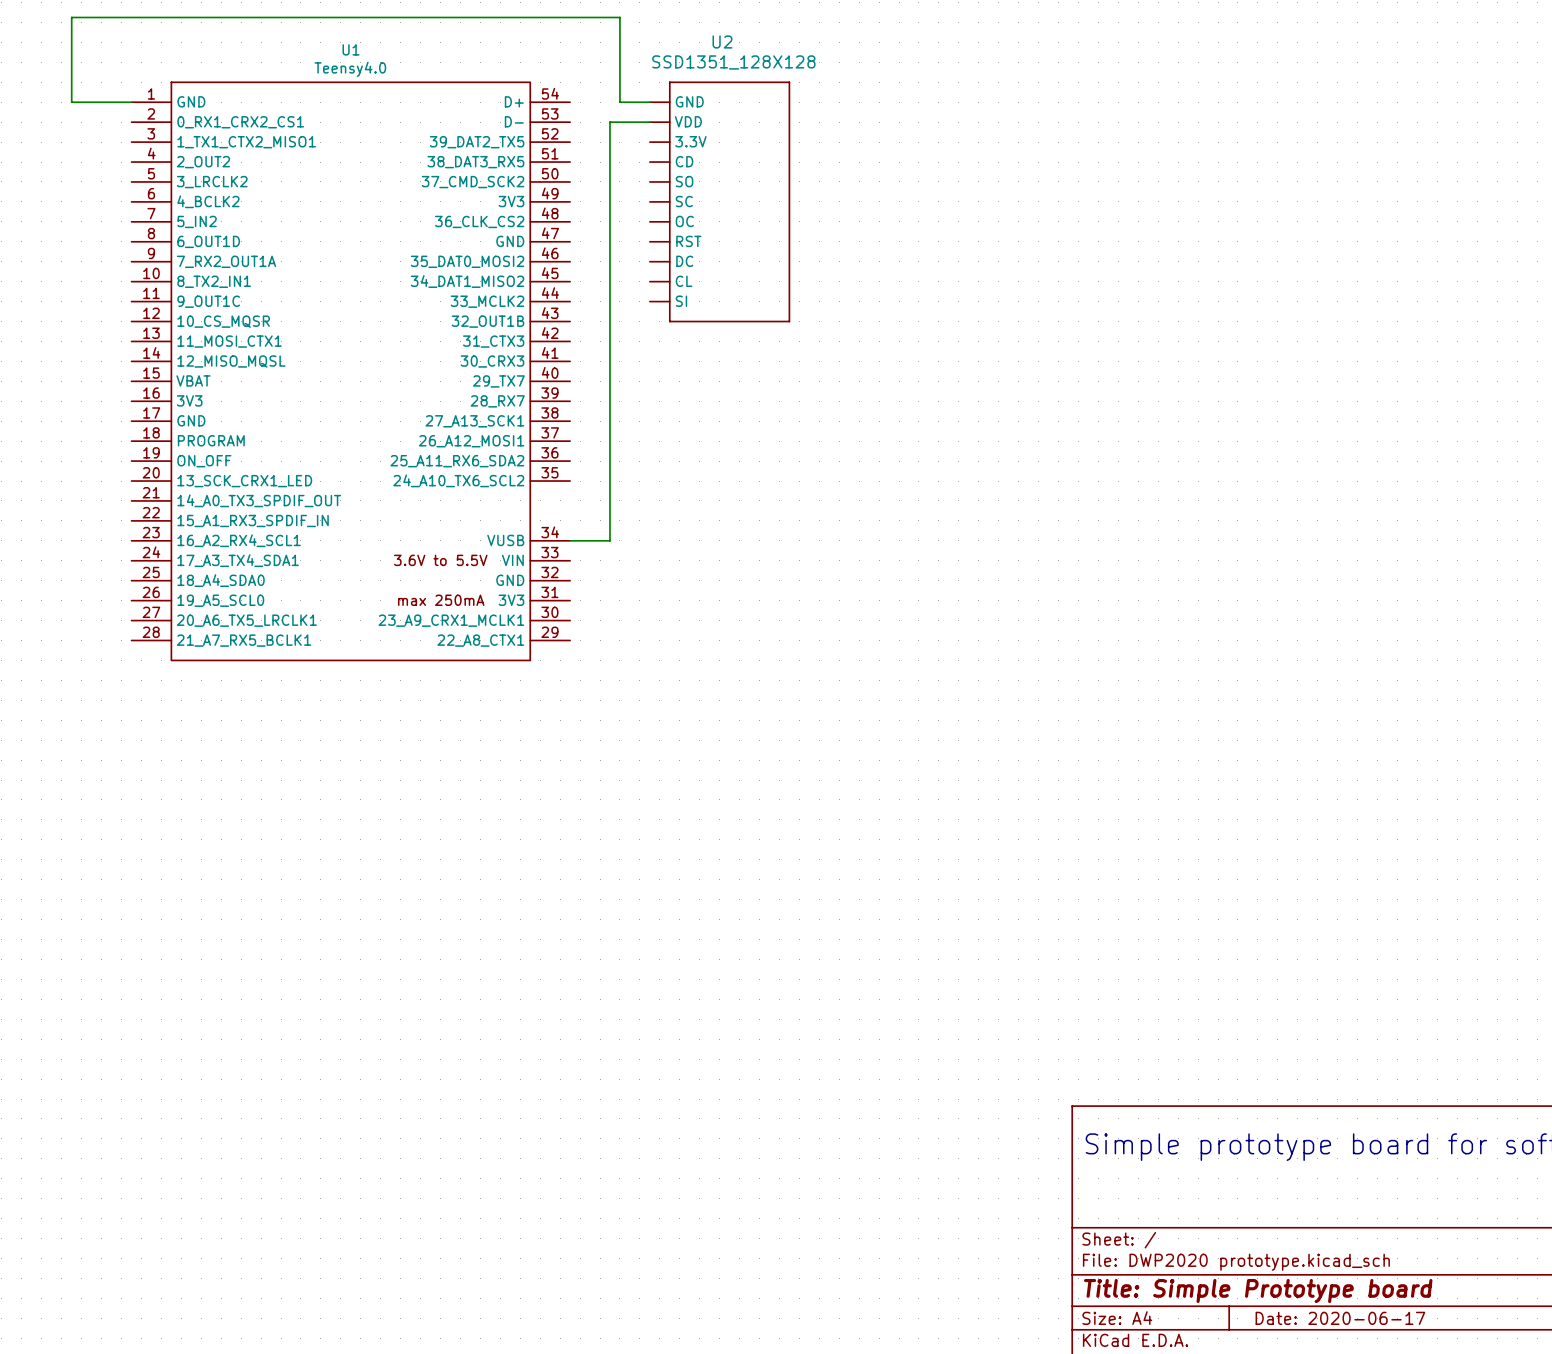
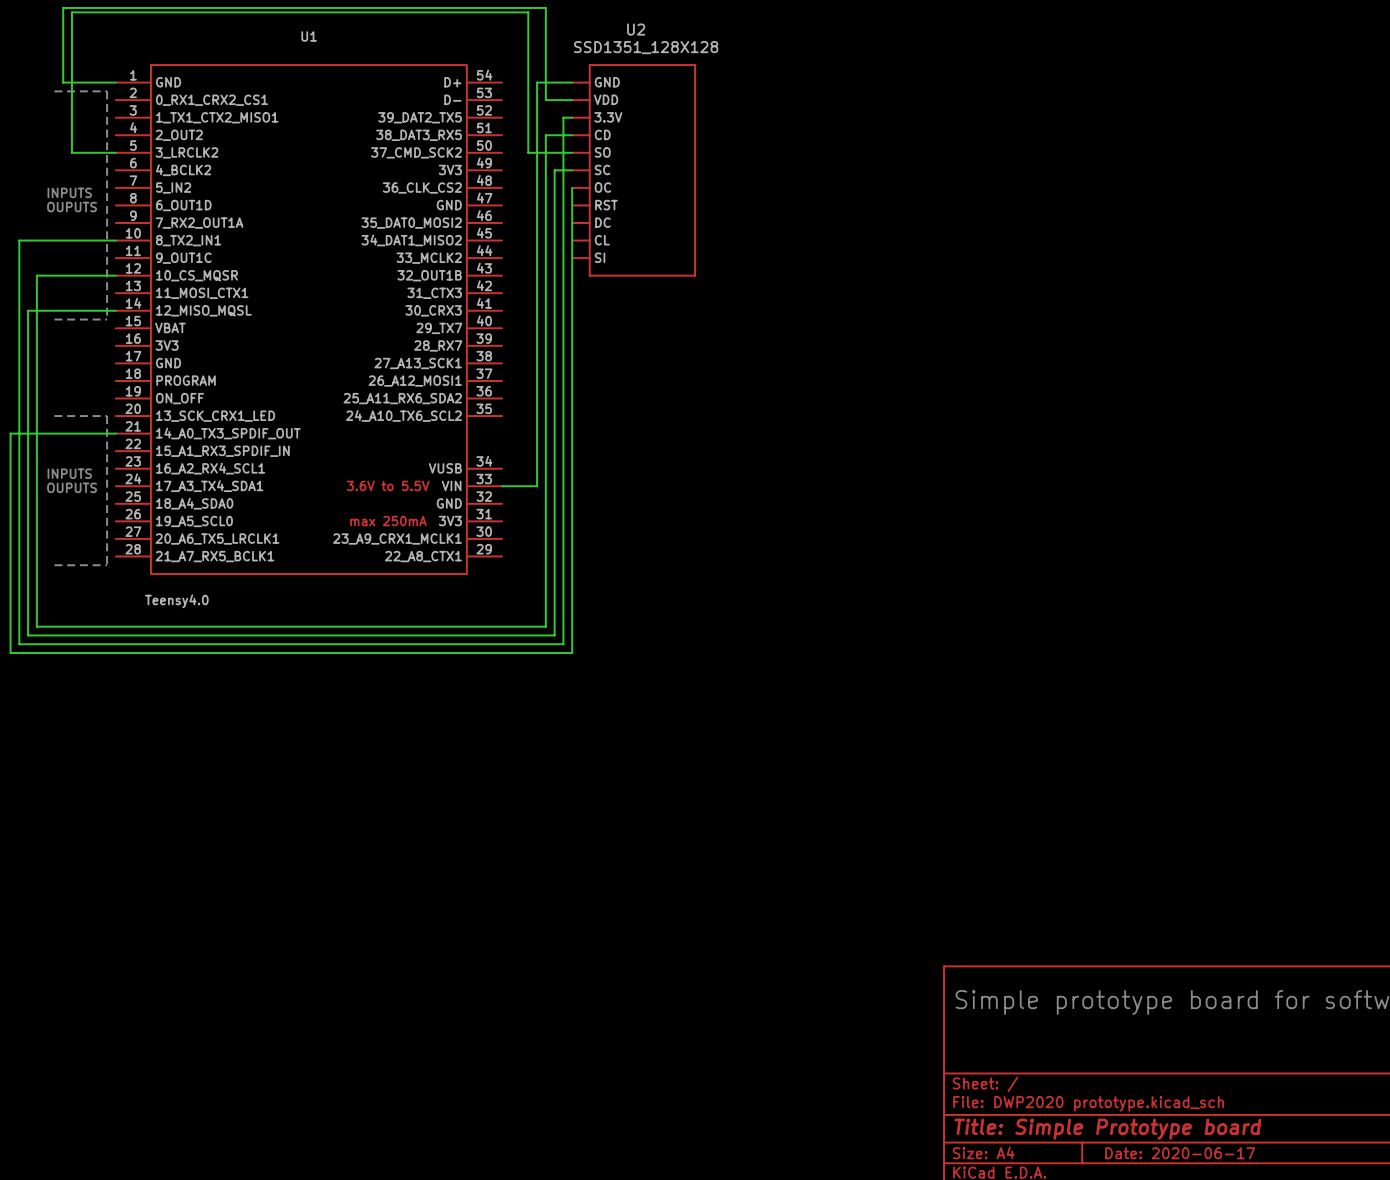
U1 value position: Teensy4.0 (350, 69) -> Teensy4.0 (176, 601)
line: none -> (54, 91) (107, 91) (107, 319) (54, 319)
wire: (609, 122) (619, 122) -> (537, 100) (537, 82) (545, 82) (545, 100)
wire: none -> (572, 117) (563, 117) (563, 644) (19, 644) (19, 240) (115, 240)
wire: none -> (572, 135) (545, 135) (545, 626) (36, 626) (36, 275) (115, 275)
wire: none -> (115, 152) (71, 152) (71, 12) (528, 12) (528, 152) (572, 152)
wire: none -> (572, 170) (554, 170) (554, 635) (28, 635) (28, 310) (115, 310)
wire: none -> (572, 187) (572, 653) (10, 653) (10, 433) (115, 433)
text: none -> INPUTS (69, 192)
text: none -> OUPUTS (72, 207)
line: none -> (54, 416) (107, 416) (107, 565) (54, 565)
wire: (570, 540) (609, 540) -> (501, 486) (537, 486) (537, 468)
text: none -> INPUTS (69, 473)
text: none -> OUPUTS (72, 487)

